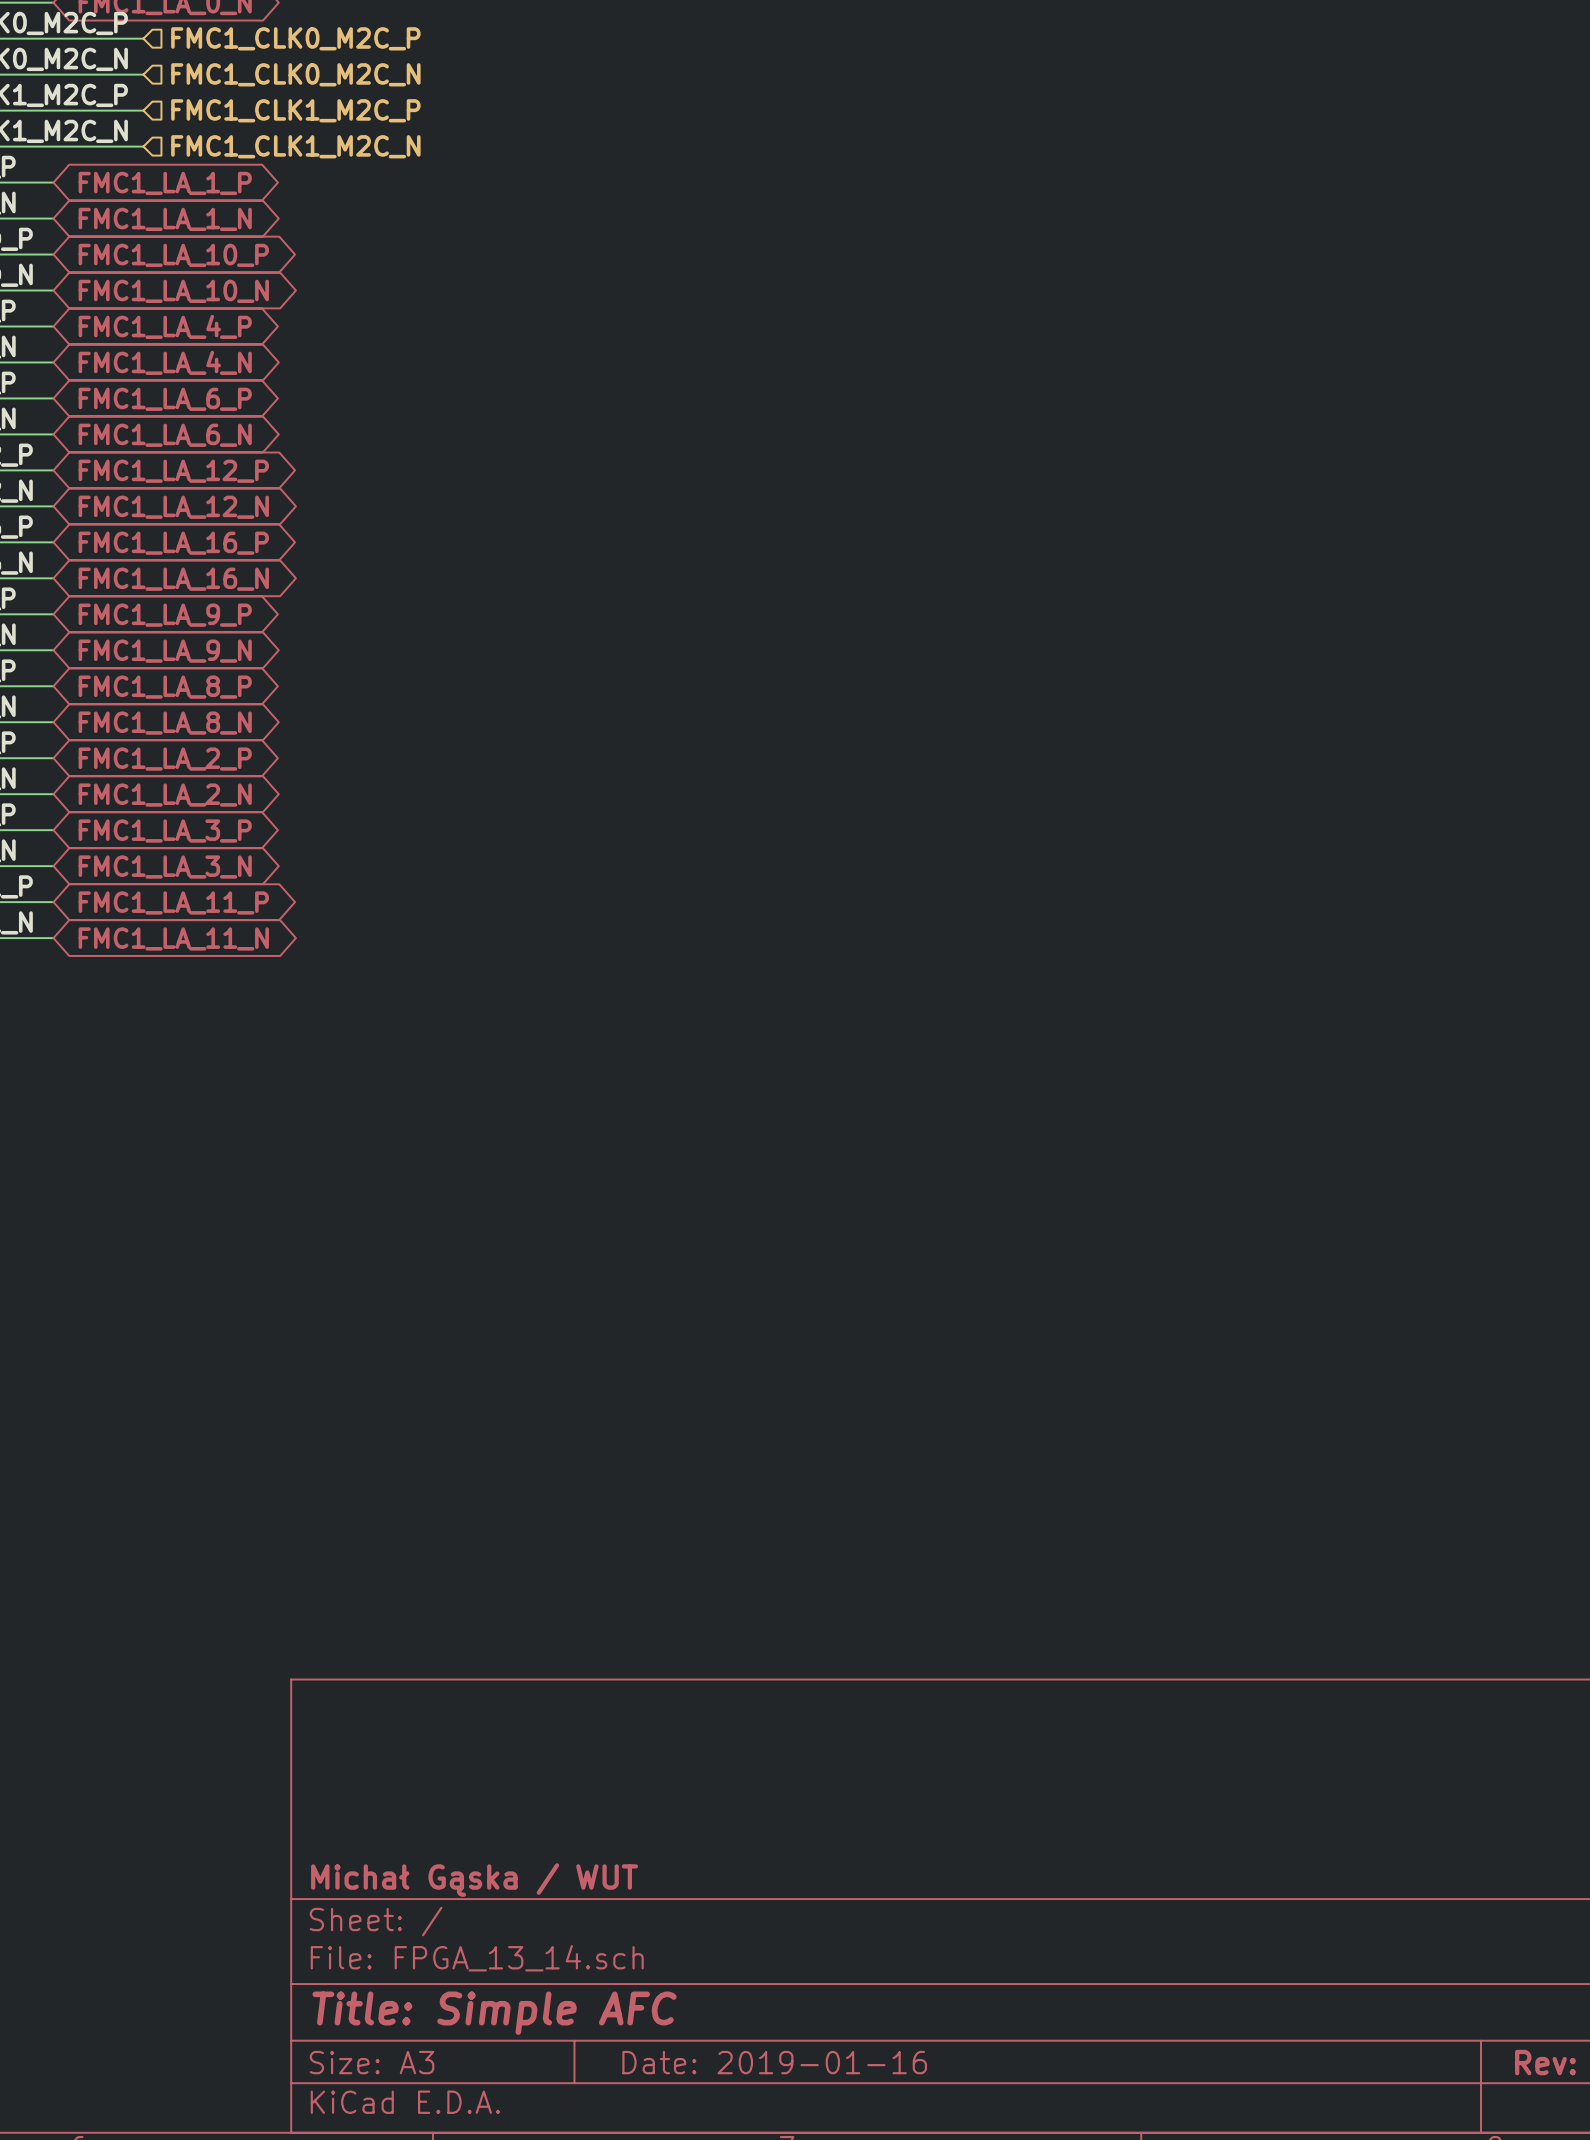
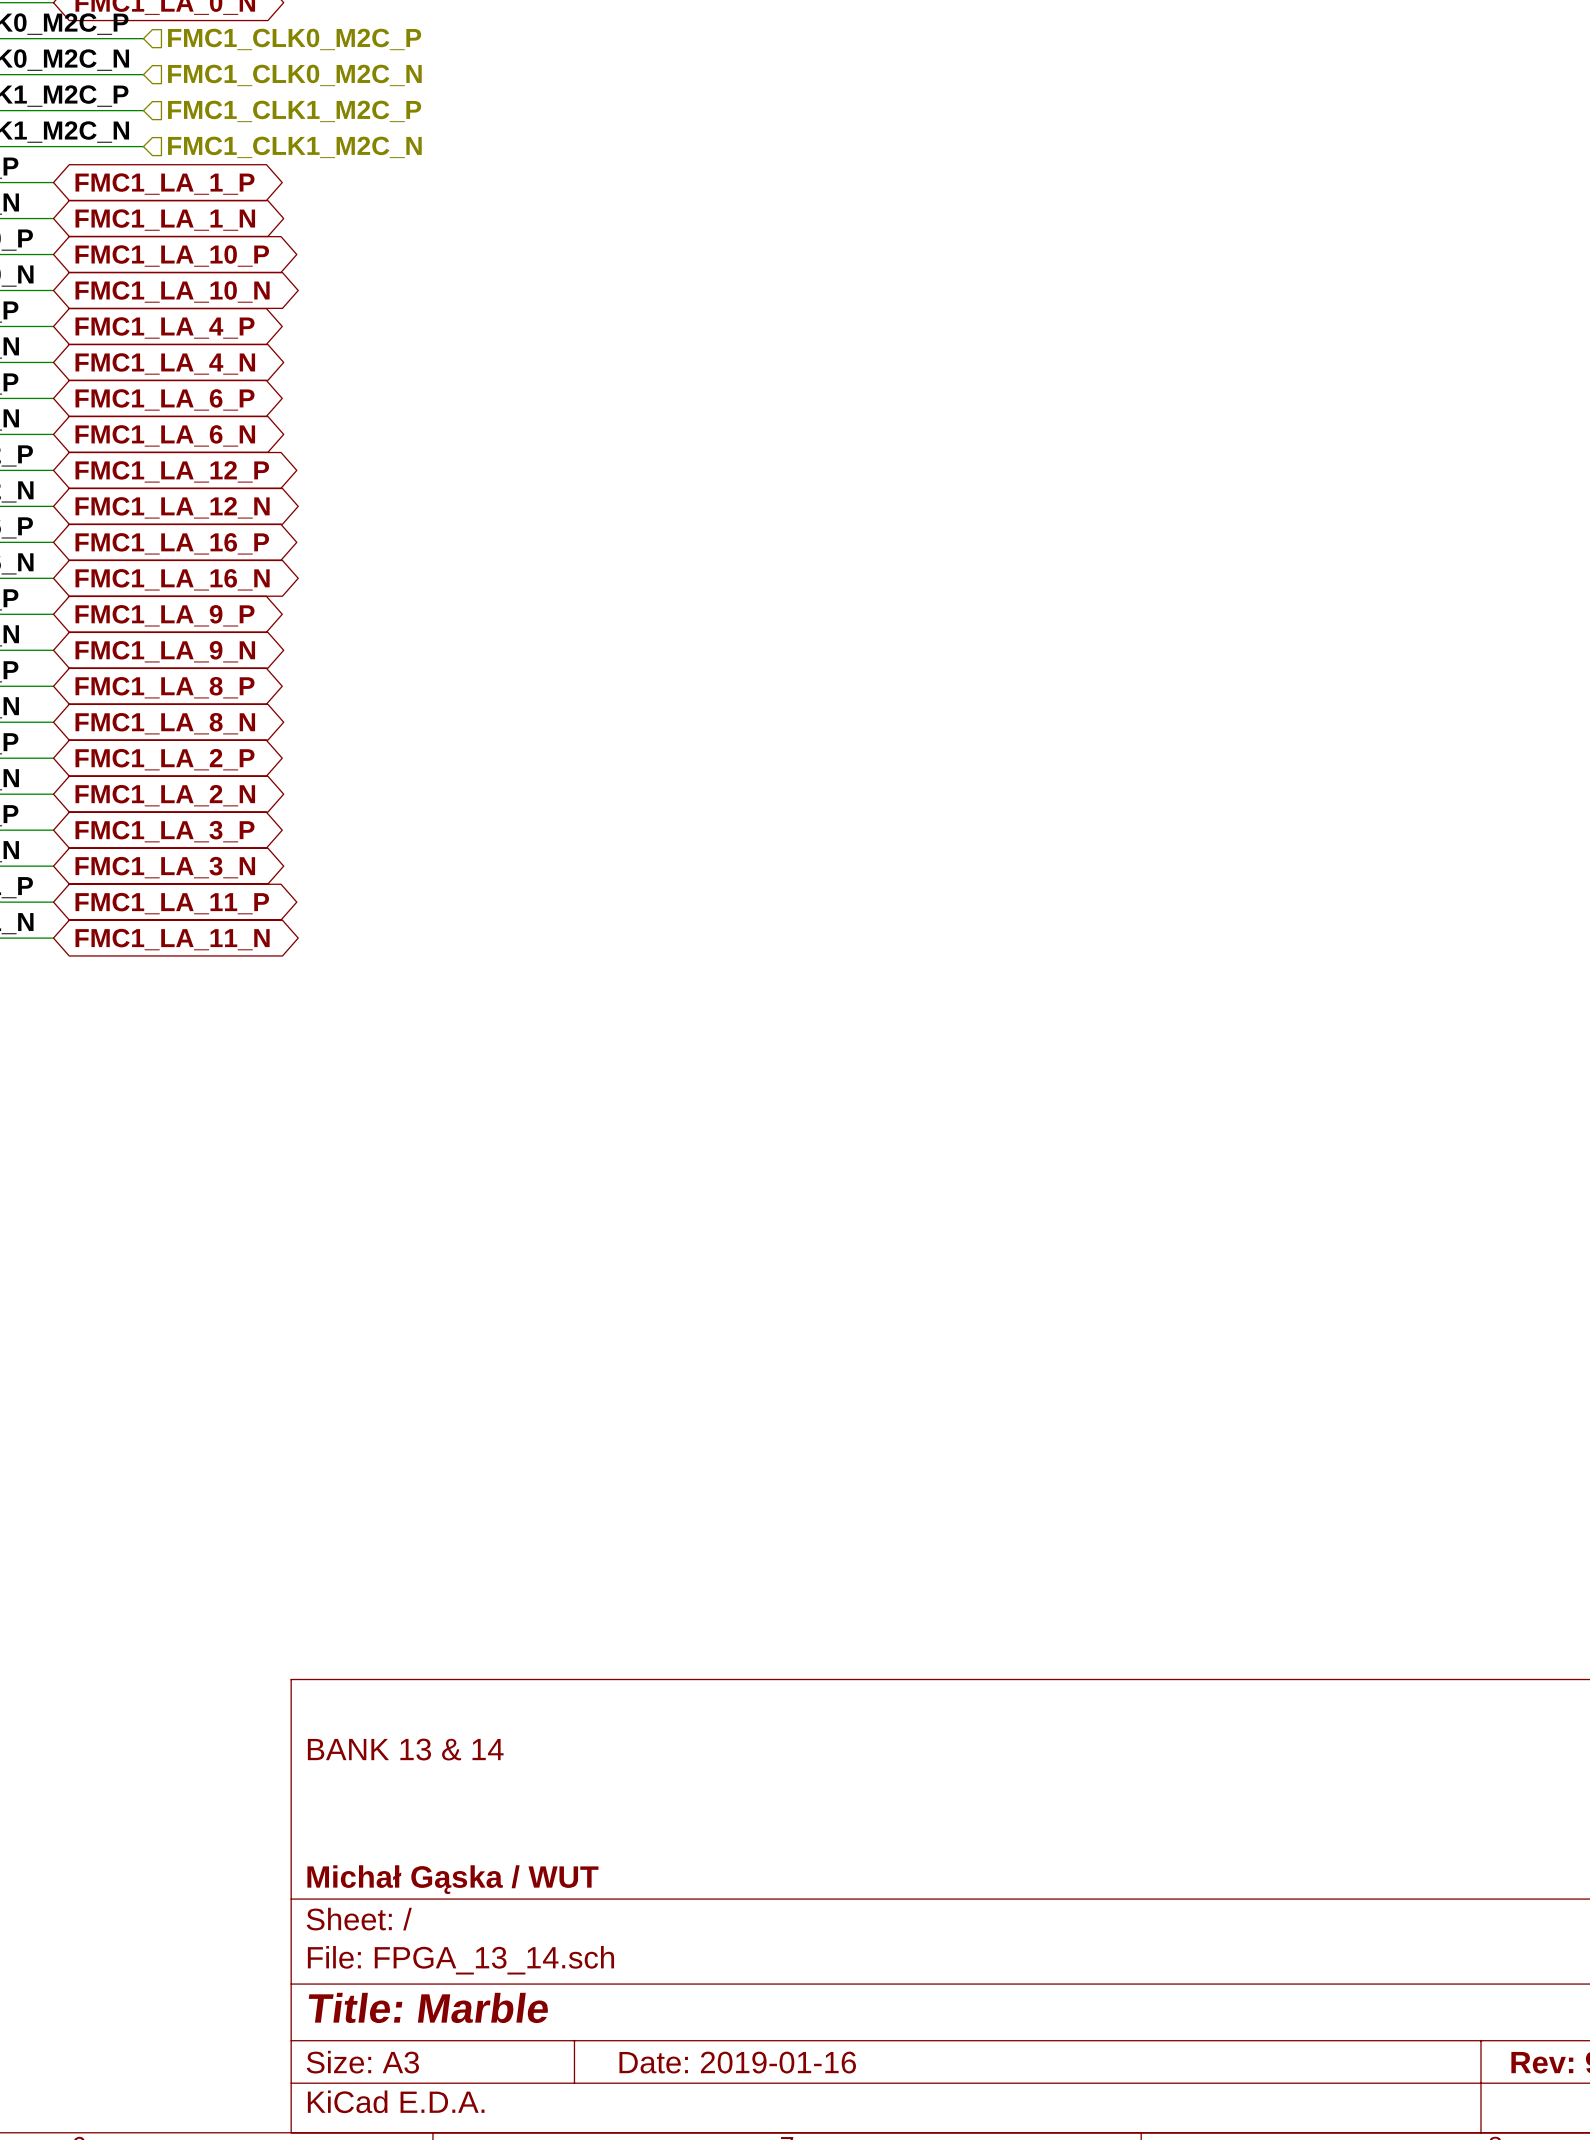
title block: none -> BANK 13 & 14 (405, 1749)
title block: Title: Simple AFC (494, 2013) -> Title: Marble (428, 2007)

